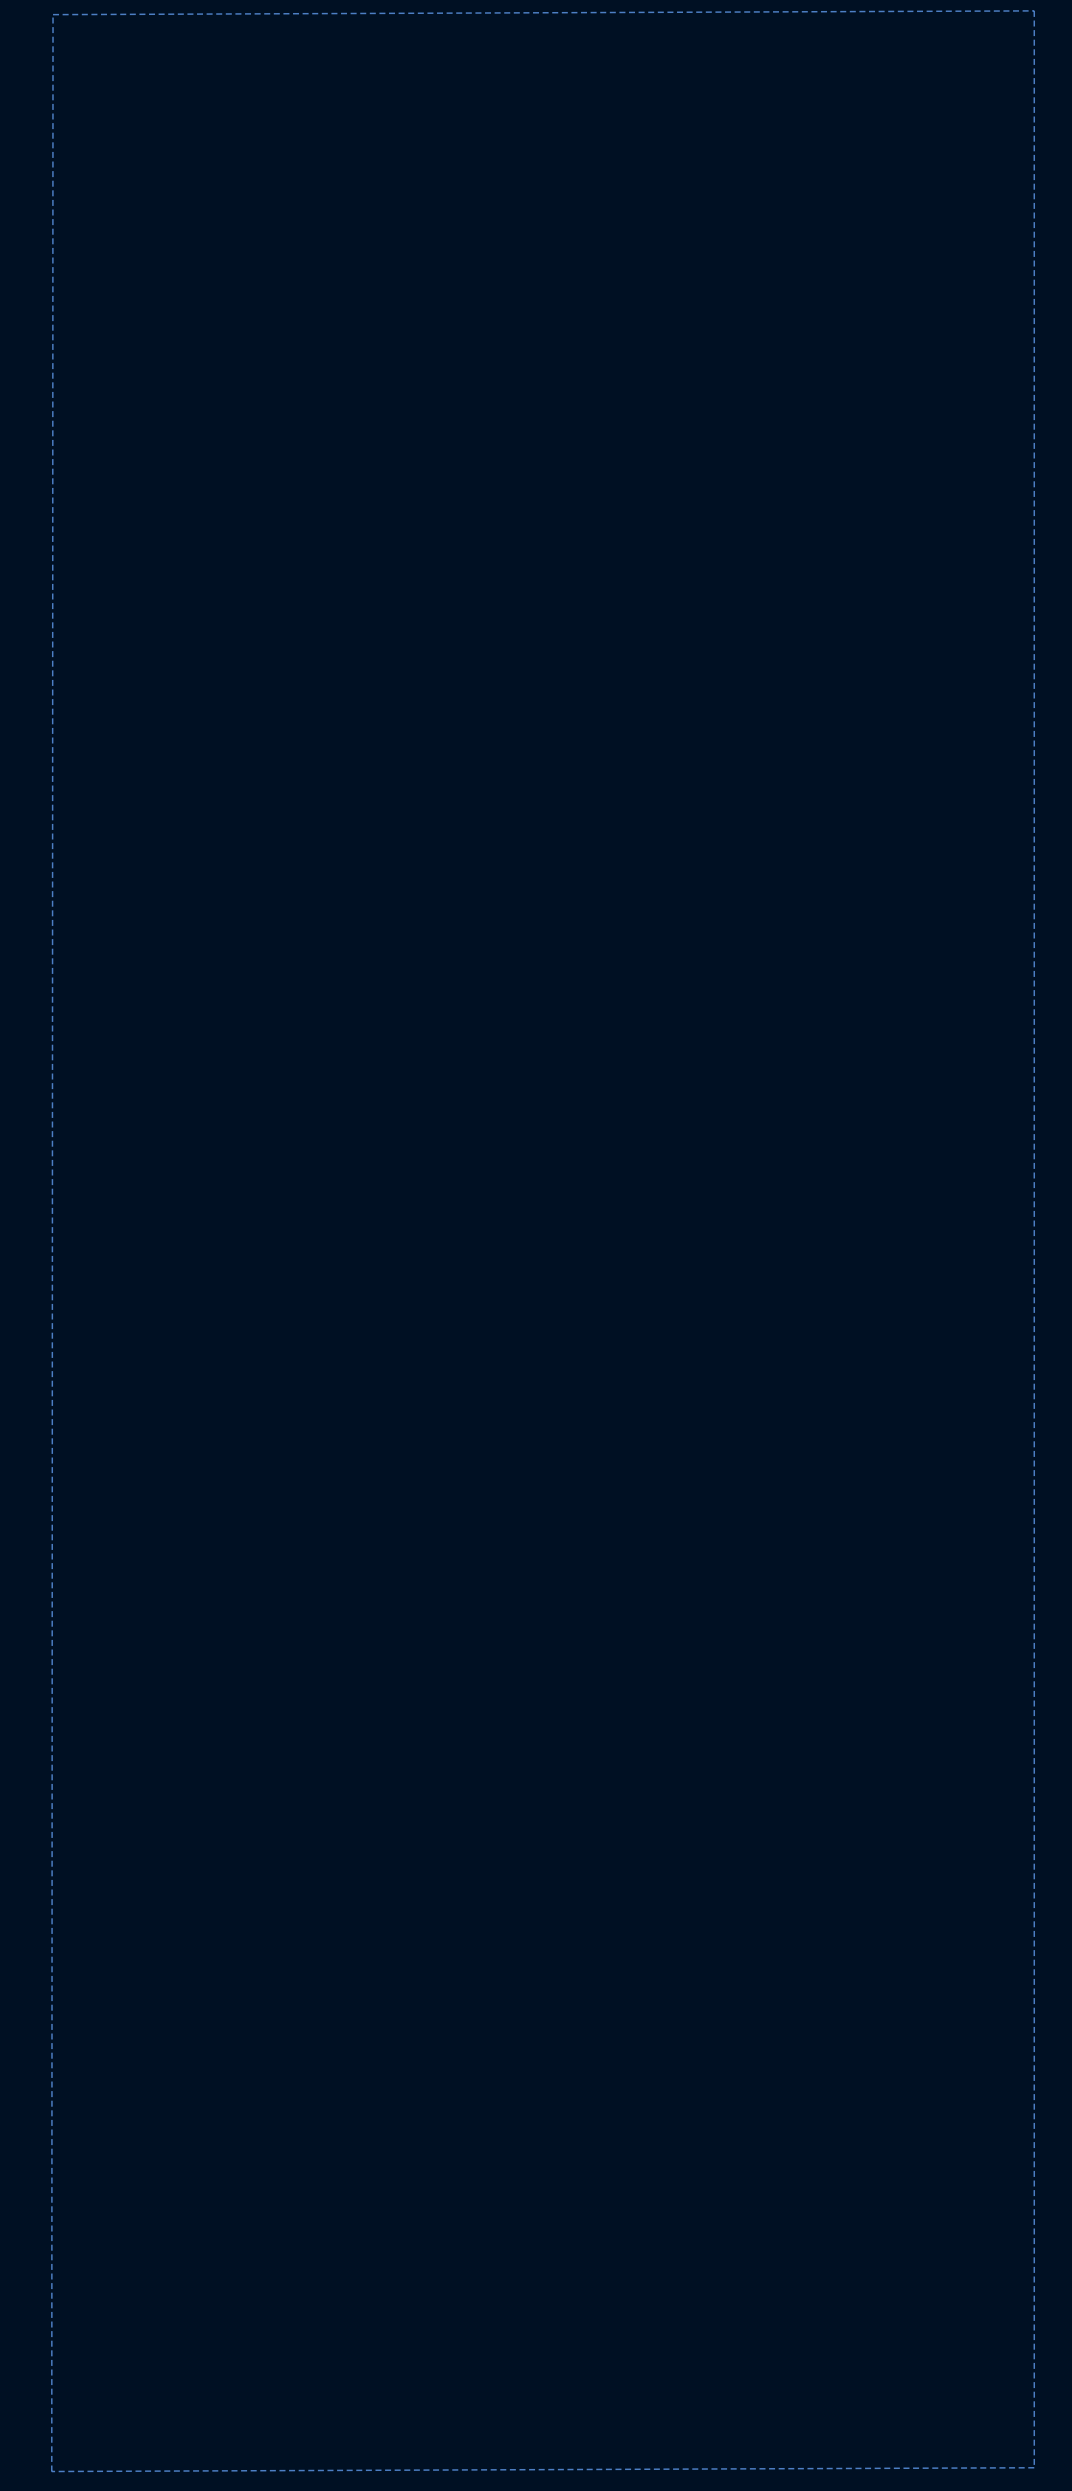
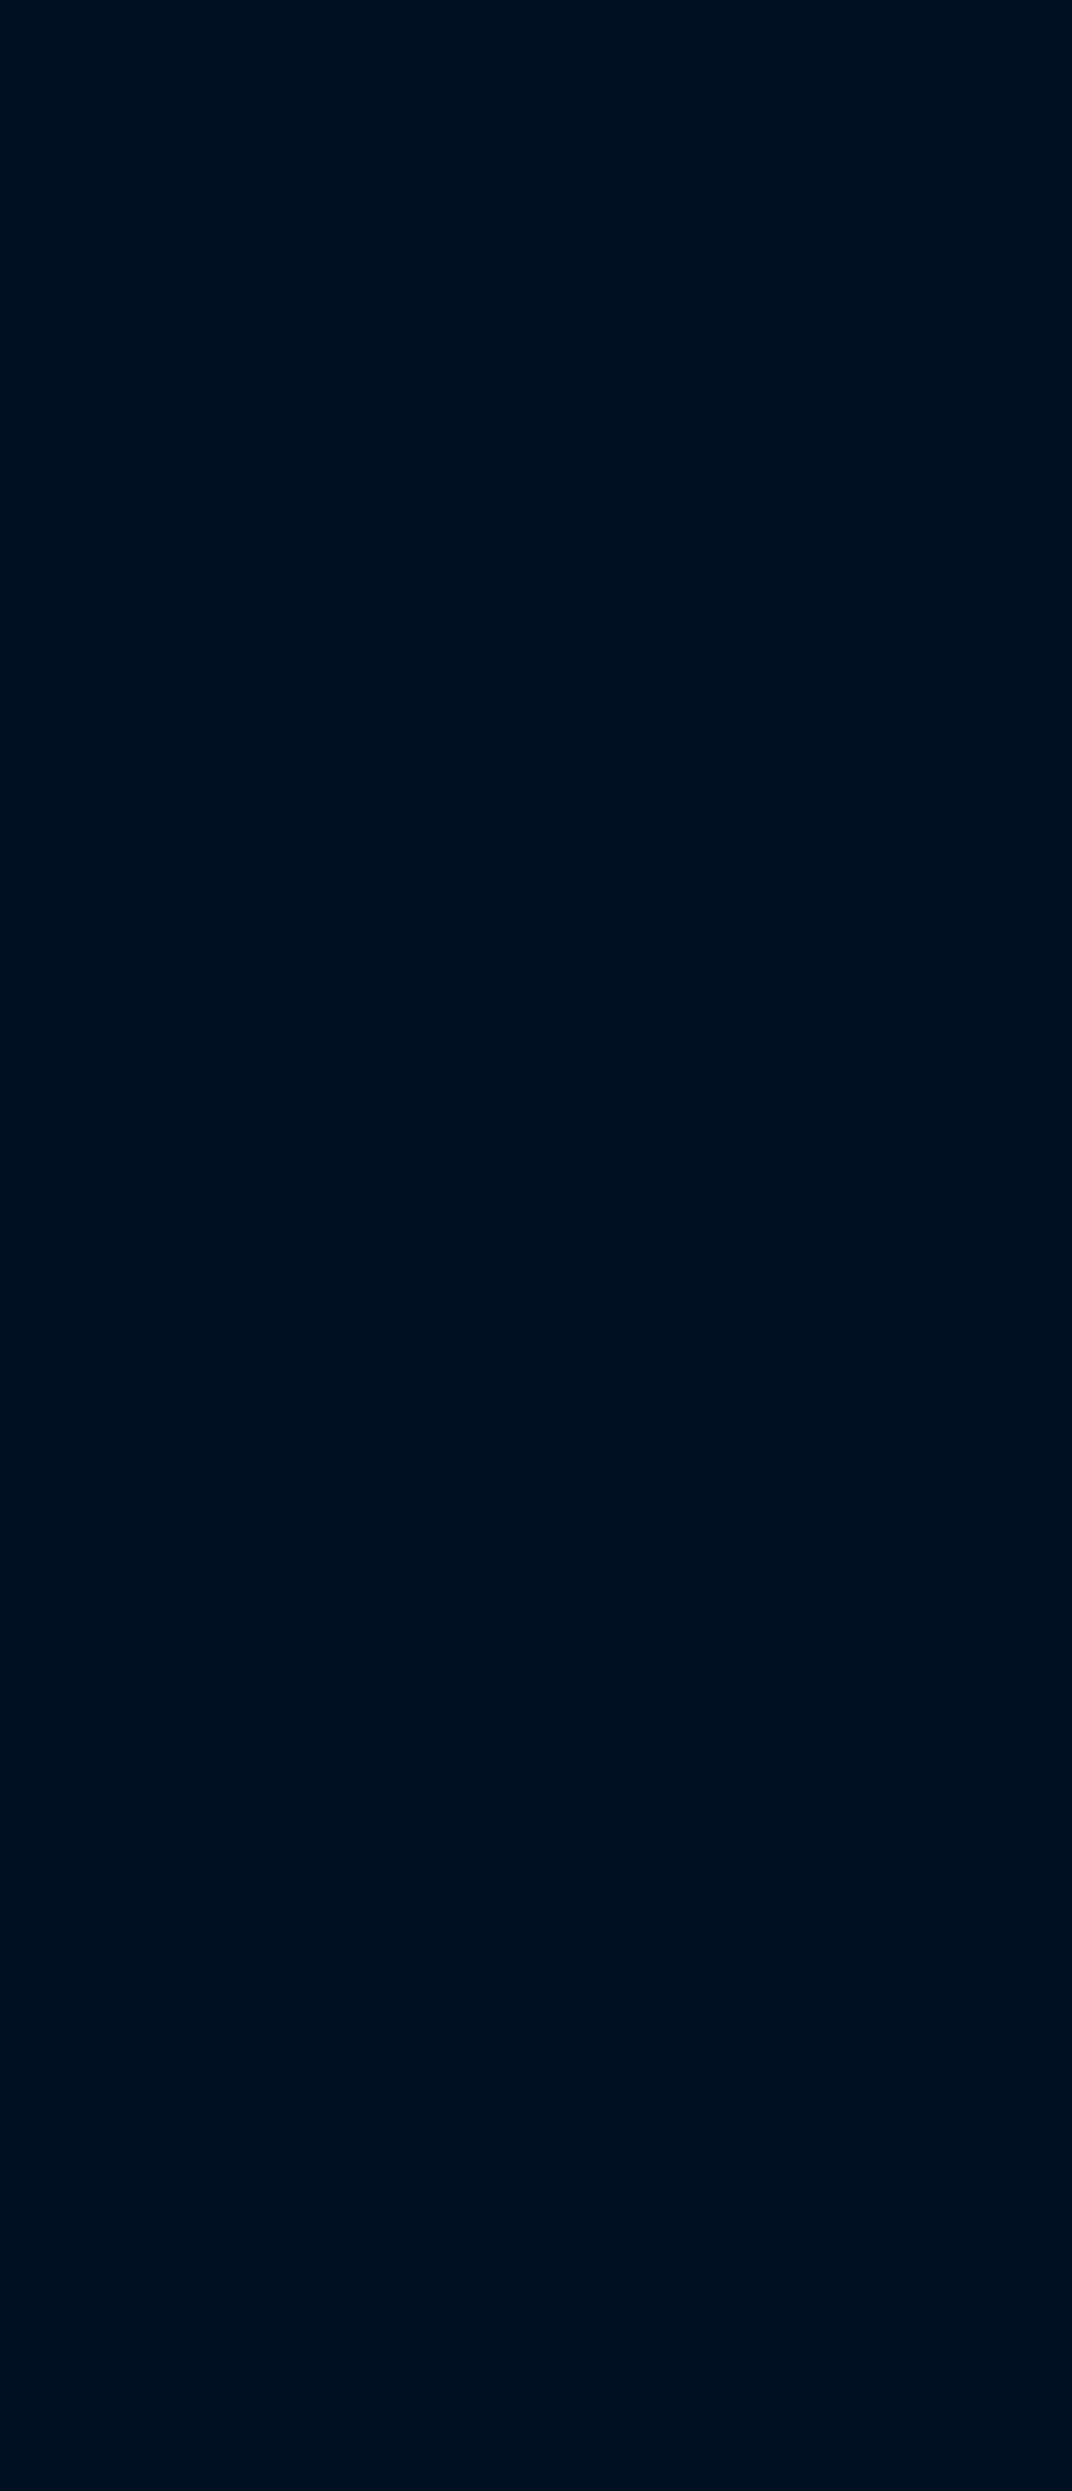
zone outline: (1034, 10) (1034, 2467) (51, 2471) (53, 14) (1034, 10) -> none

